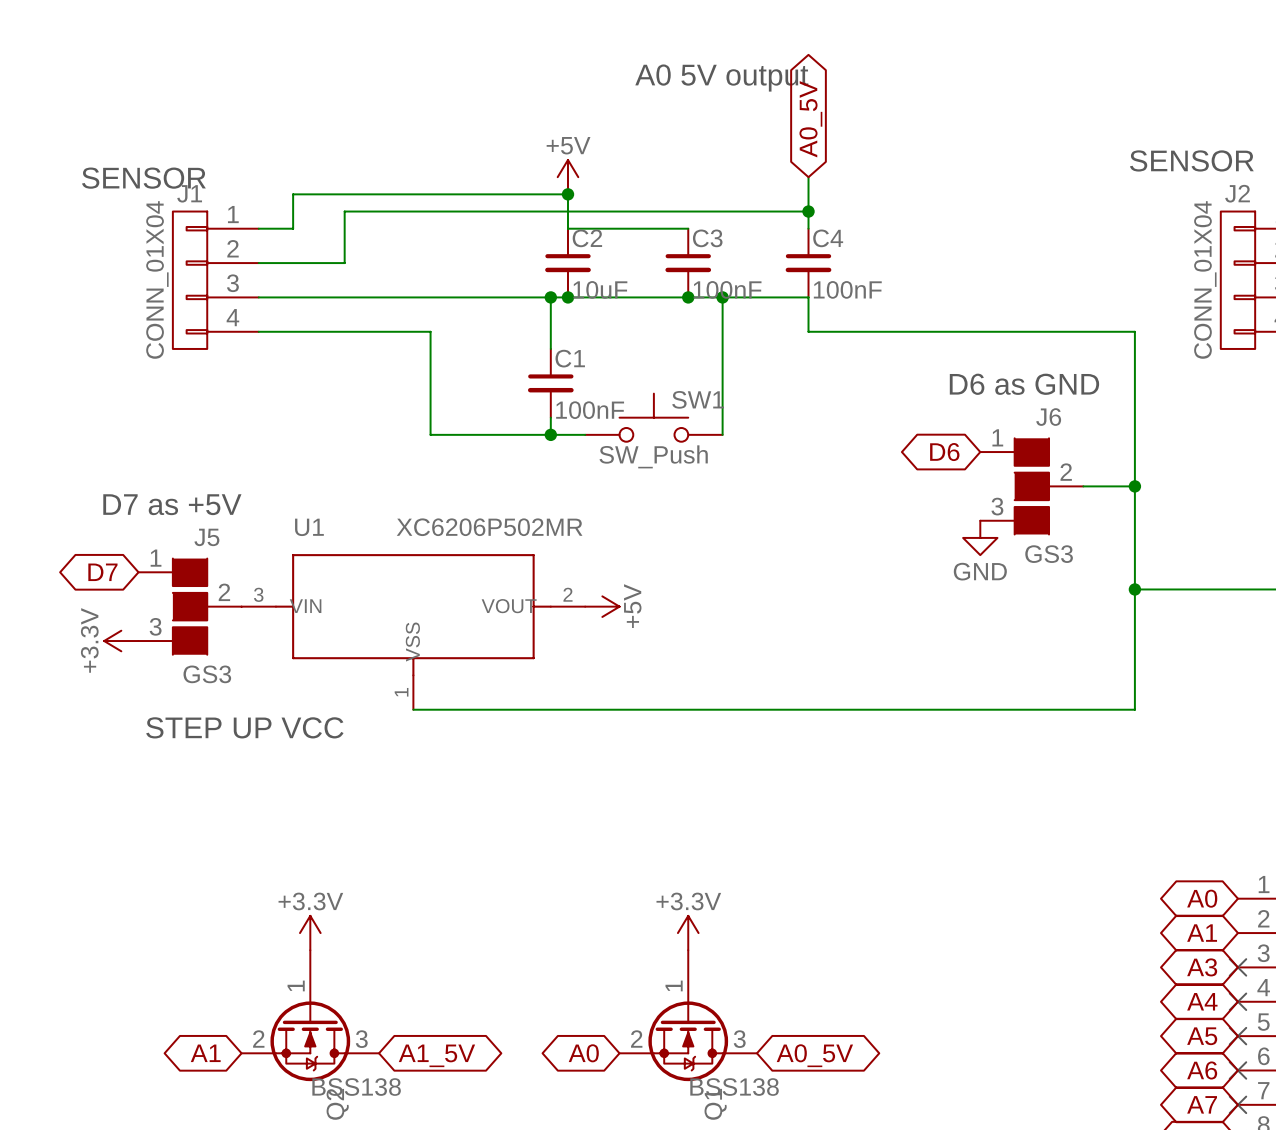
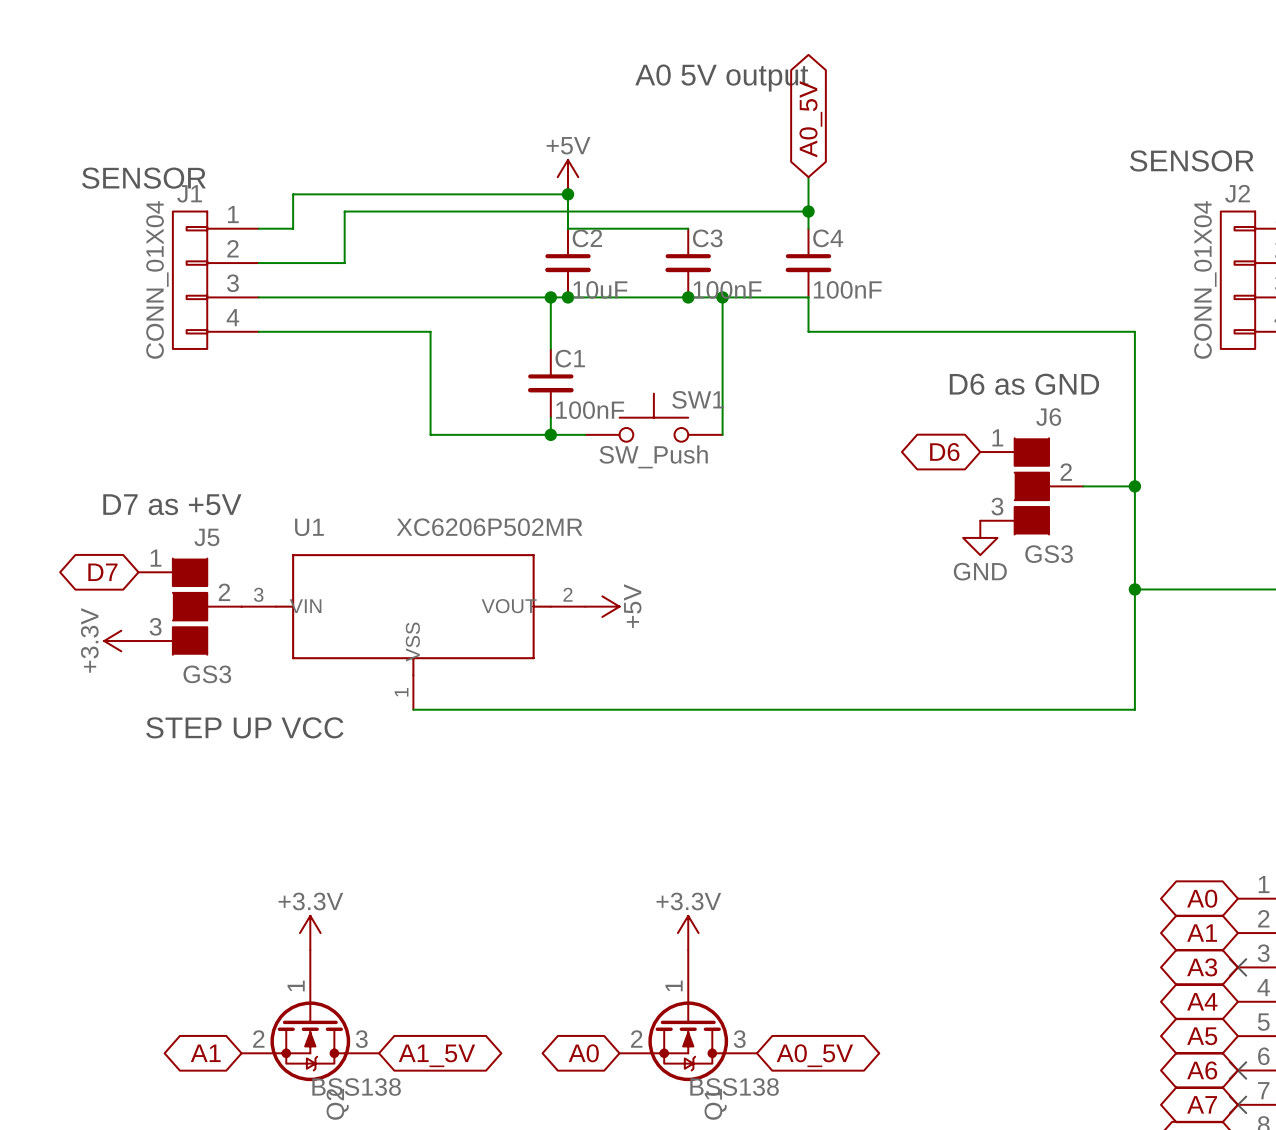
no-connect mark: (1237, 1001) -> none
no-connect mark: (1237, 1036) -> none

